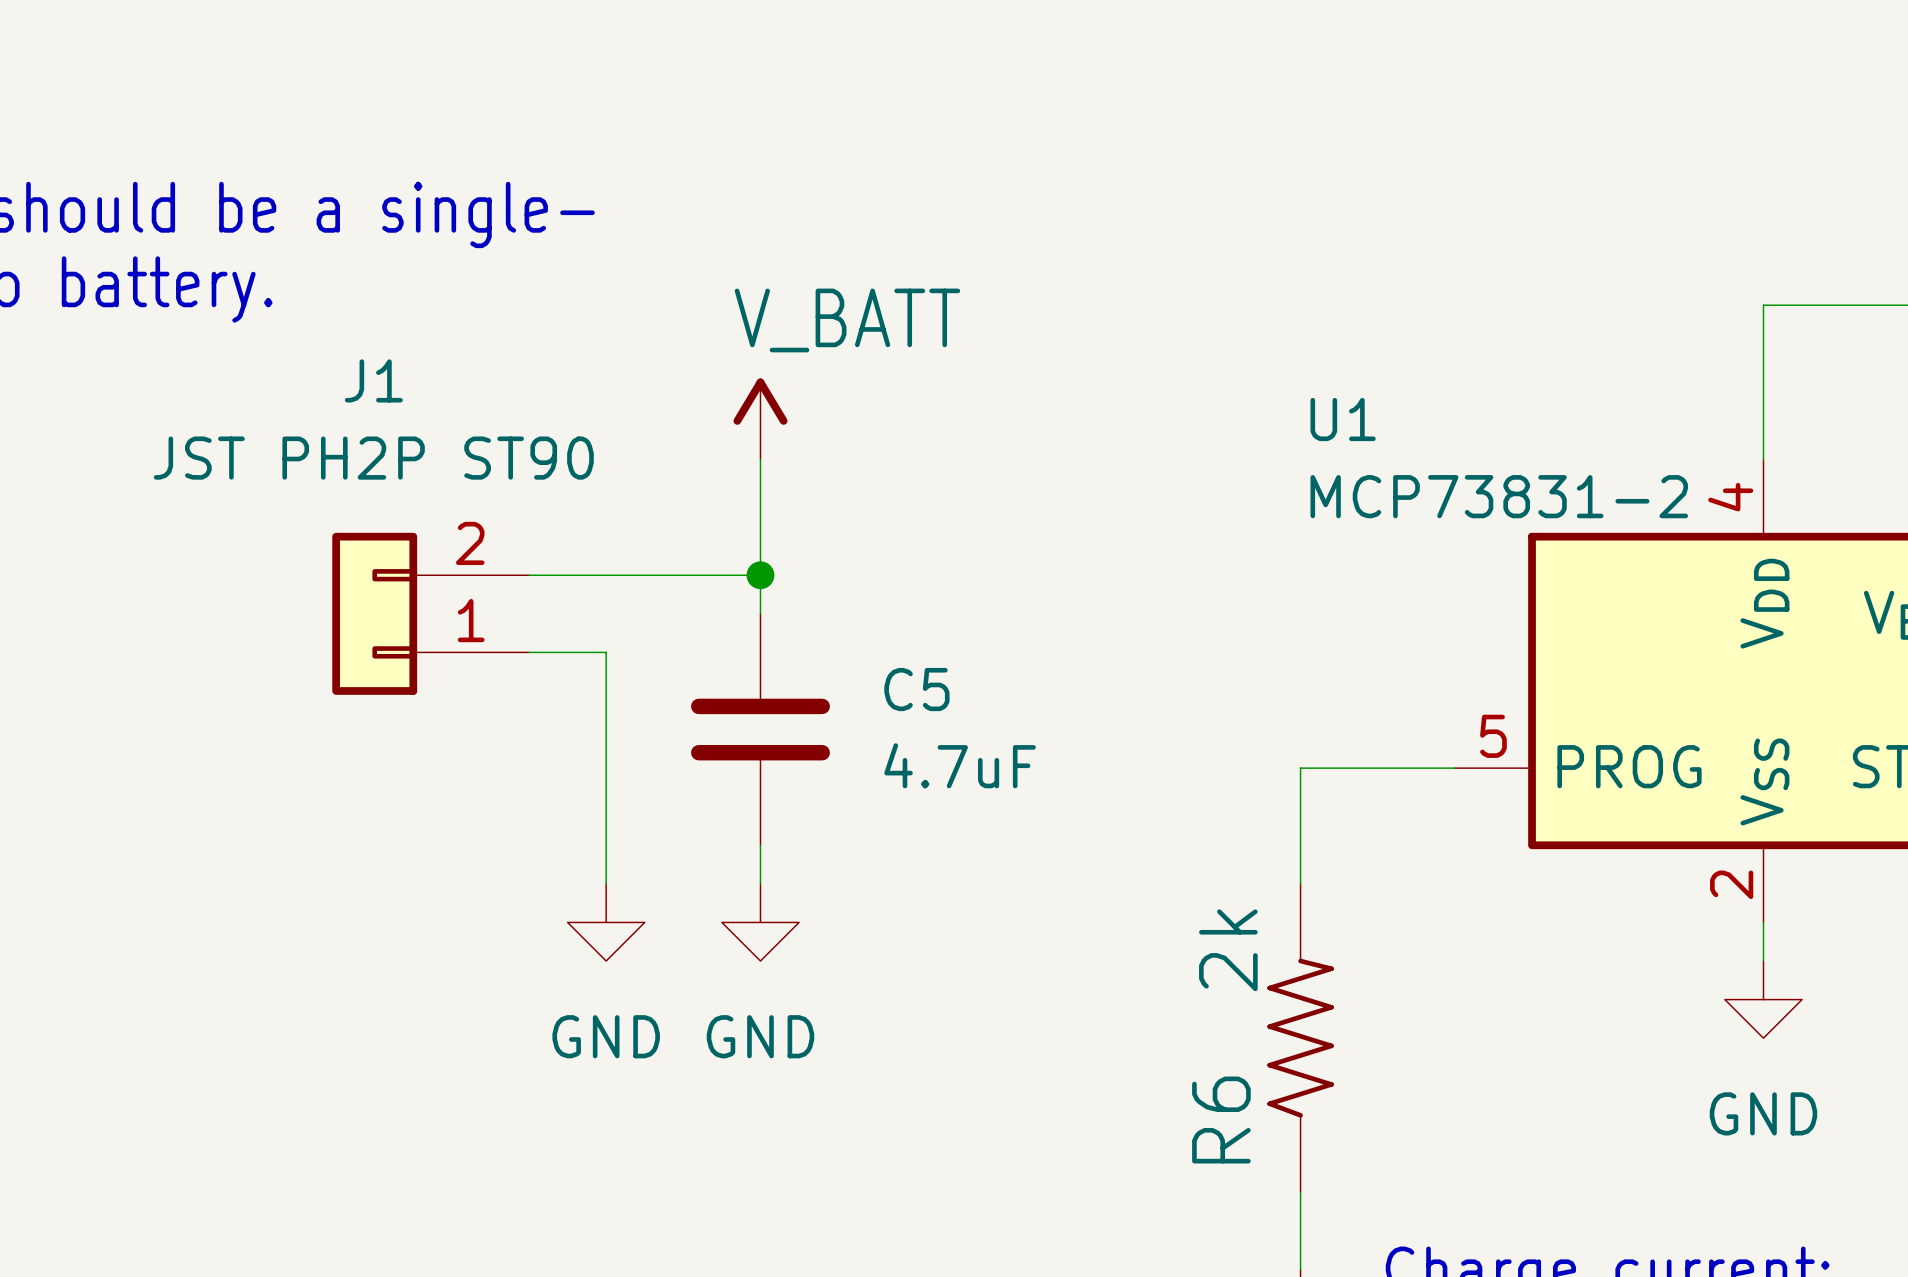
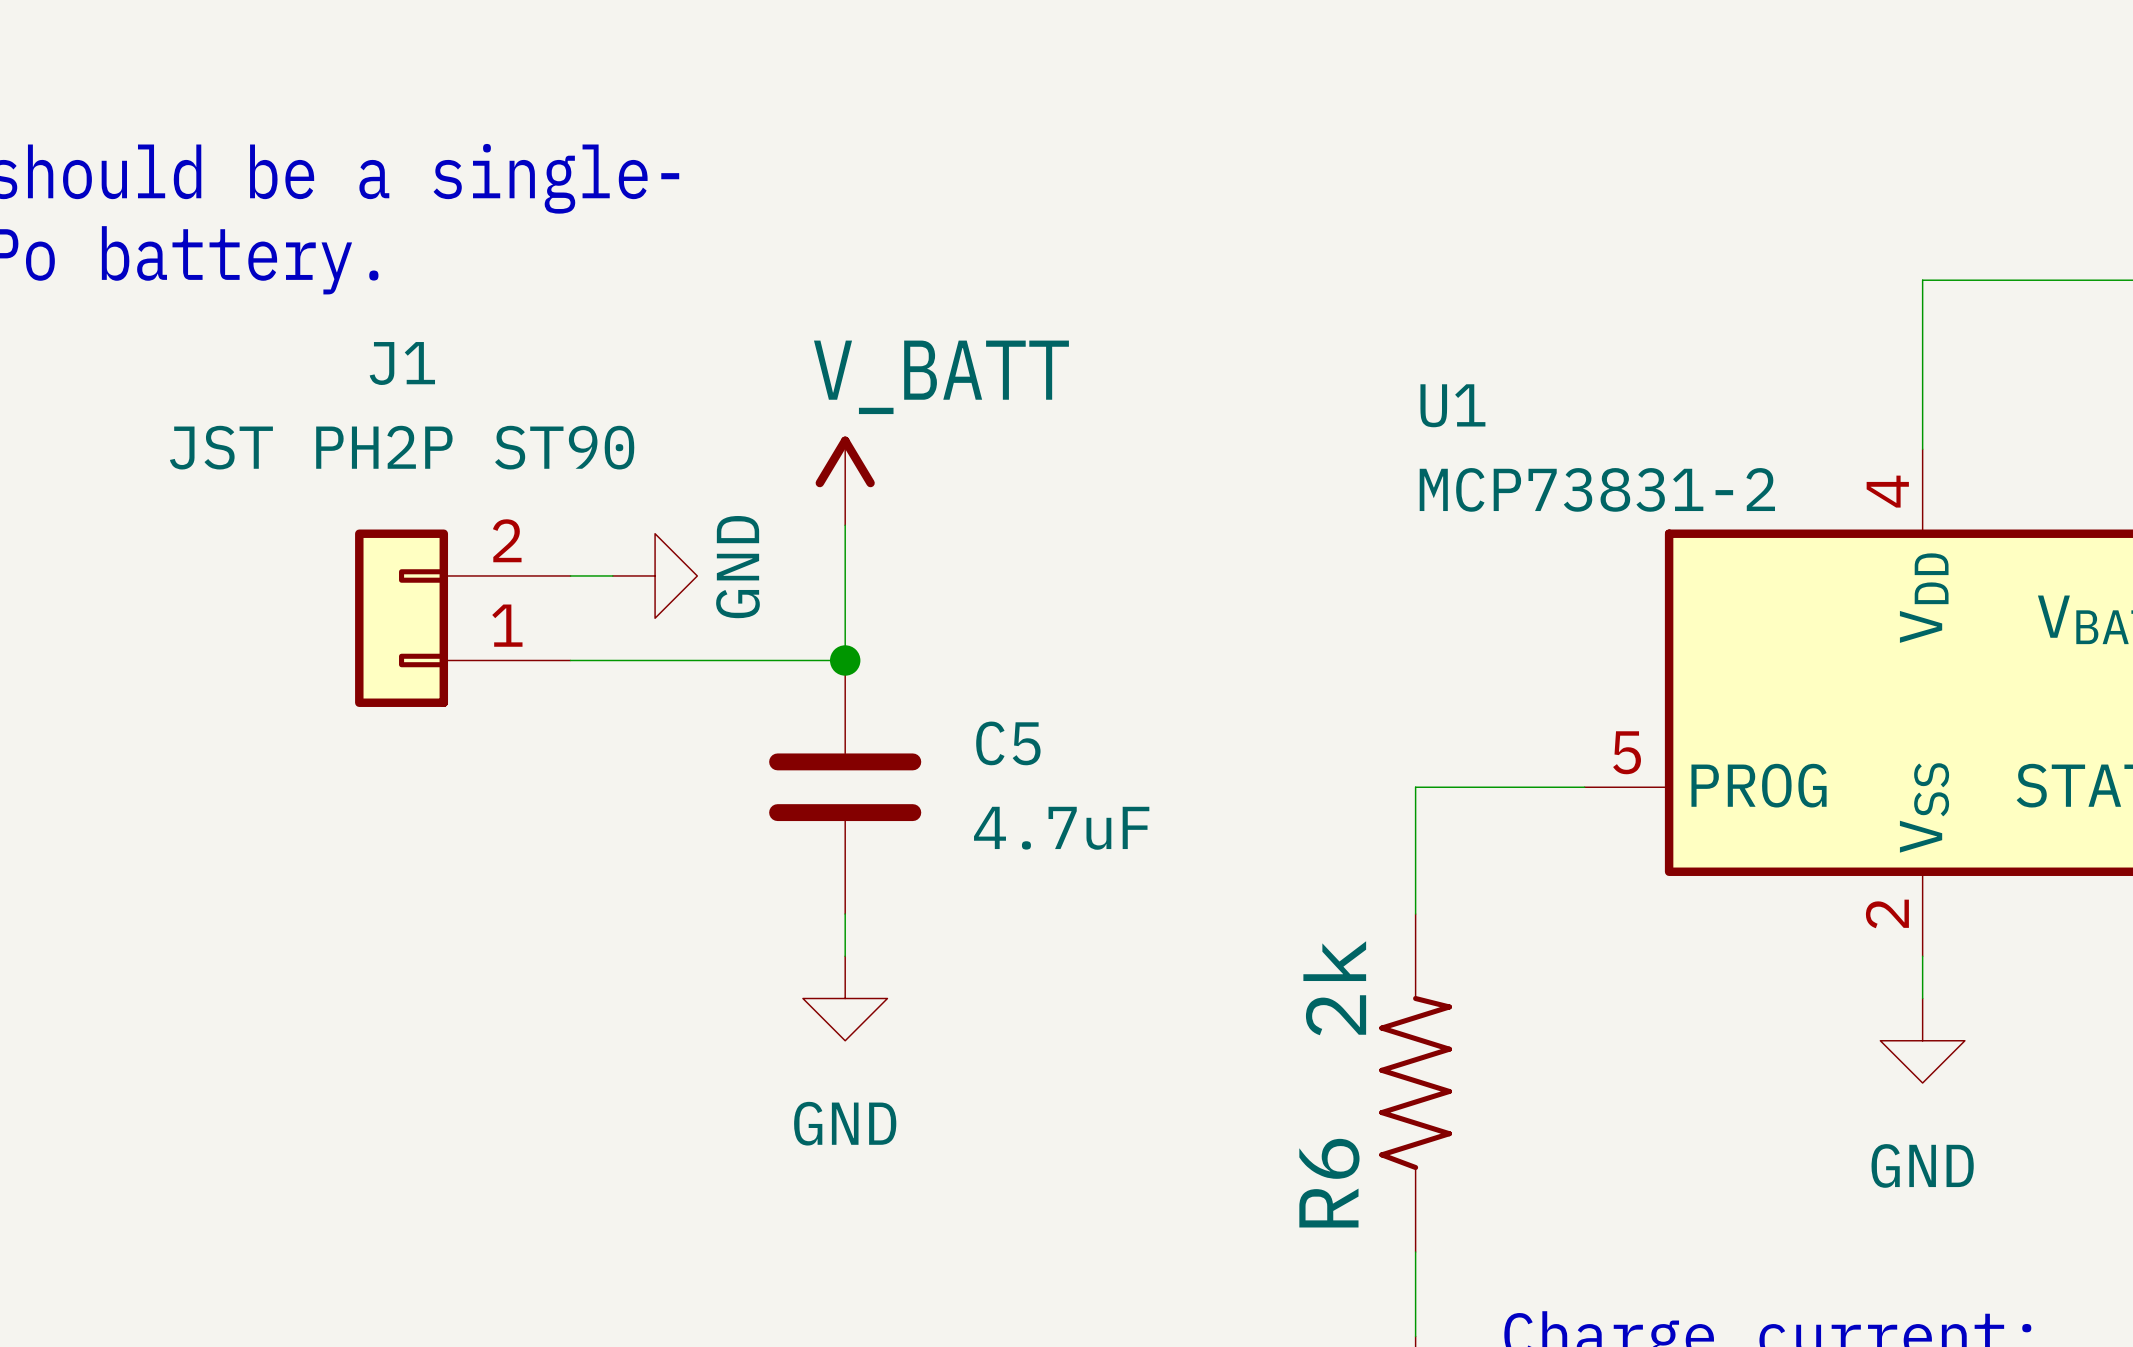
power symbol position: V_BATT (760, 419) -> V_BATT (845, 480)
wire: (760, 459) (760, 613) -> none
wire: (567, 575) (760, 575) -> none
power symbol: none -> GND (655, 575)
junction position: (760, 575) -> (845, 660)
wire: (606, 652) (606, 883) -> (655, 660) (845, 660) (845, 525)
C5 position: (760, 729) -> (845, 787)
wire: (760, 845) (760, 883) -> (845, 914) (845, 956)
power symbol: GND (606, 922) -> none
power symbol position: GND (760, 922) -> GND (845, 998)

